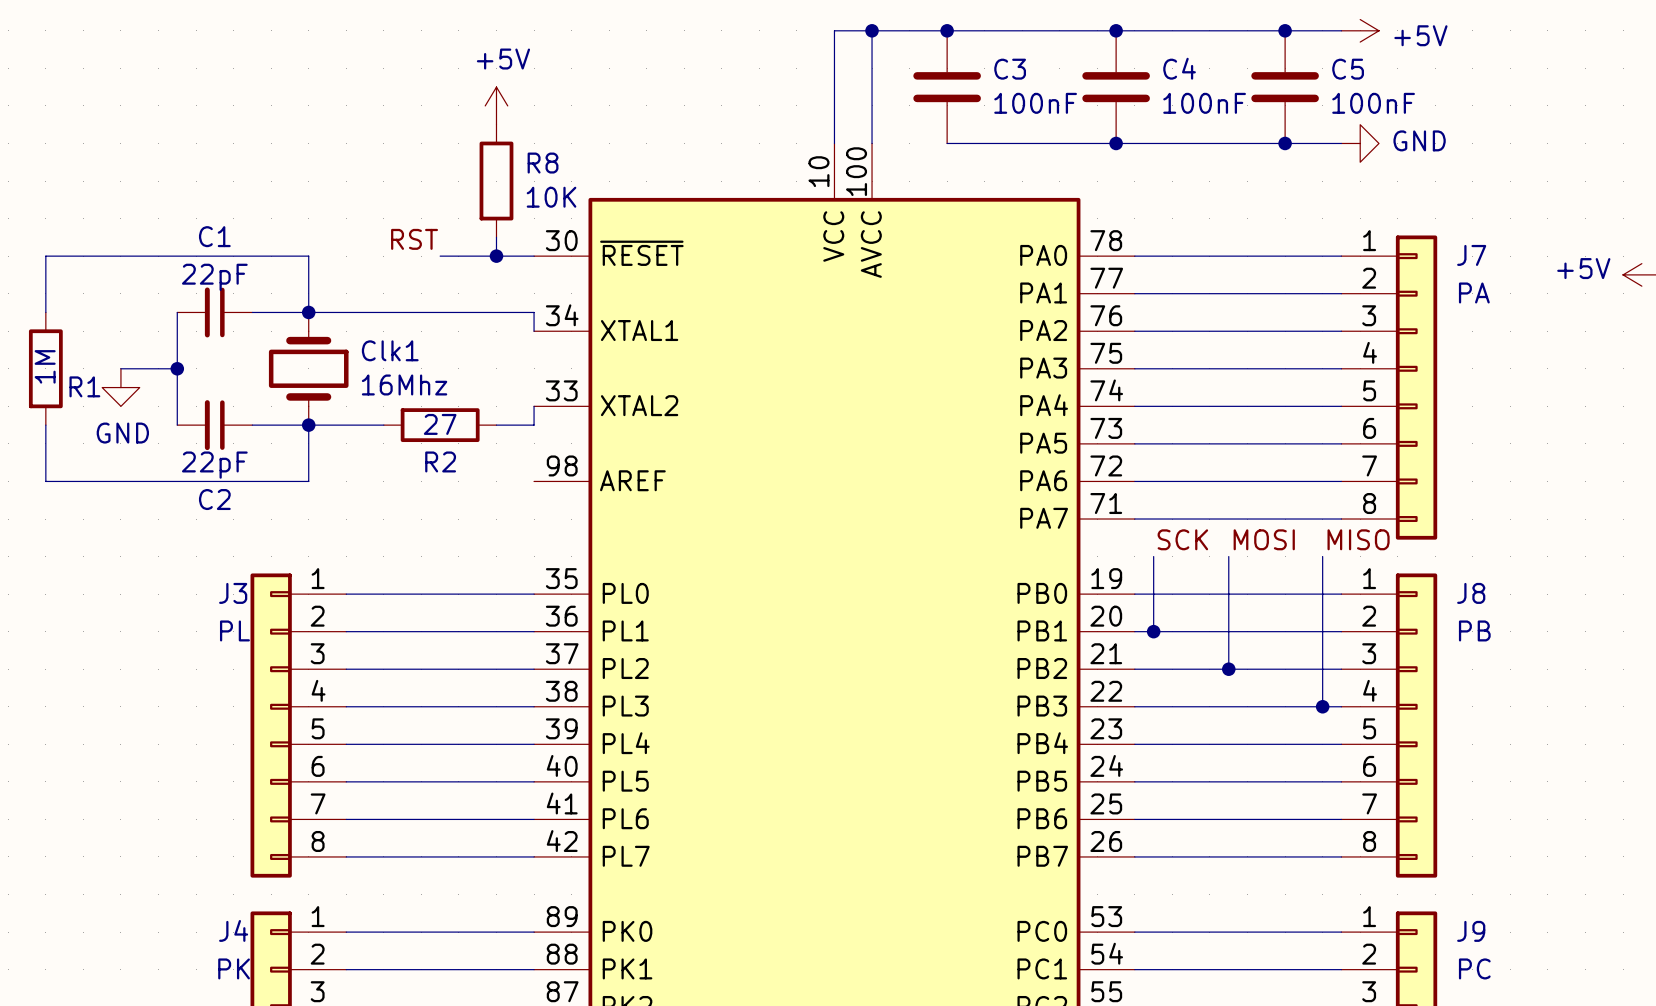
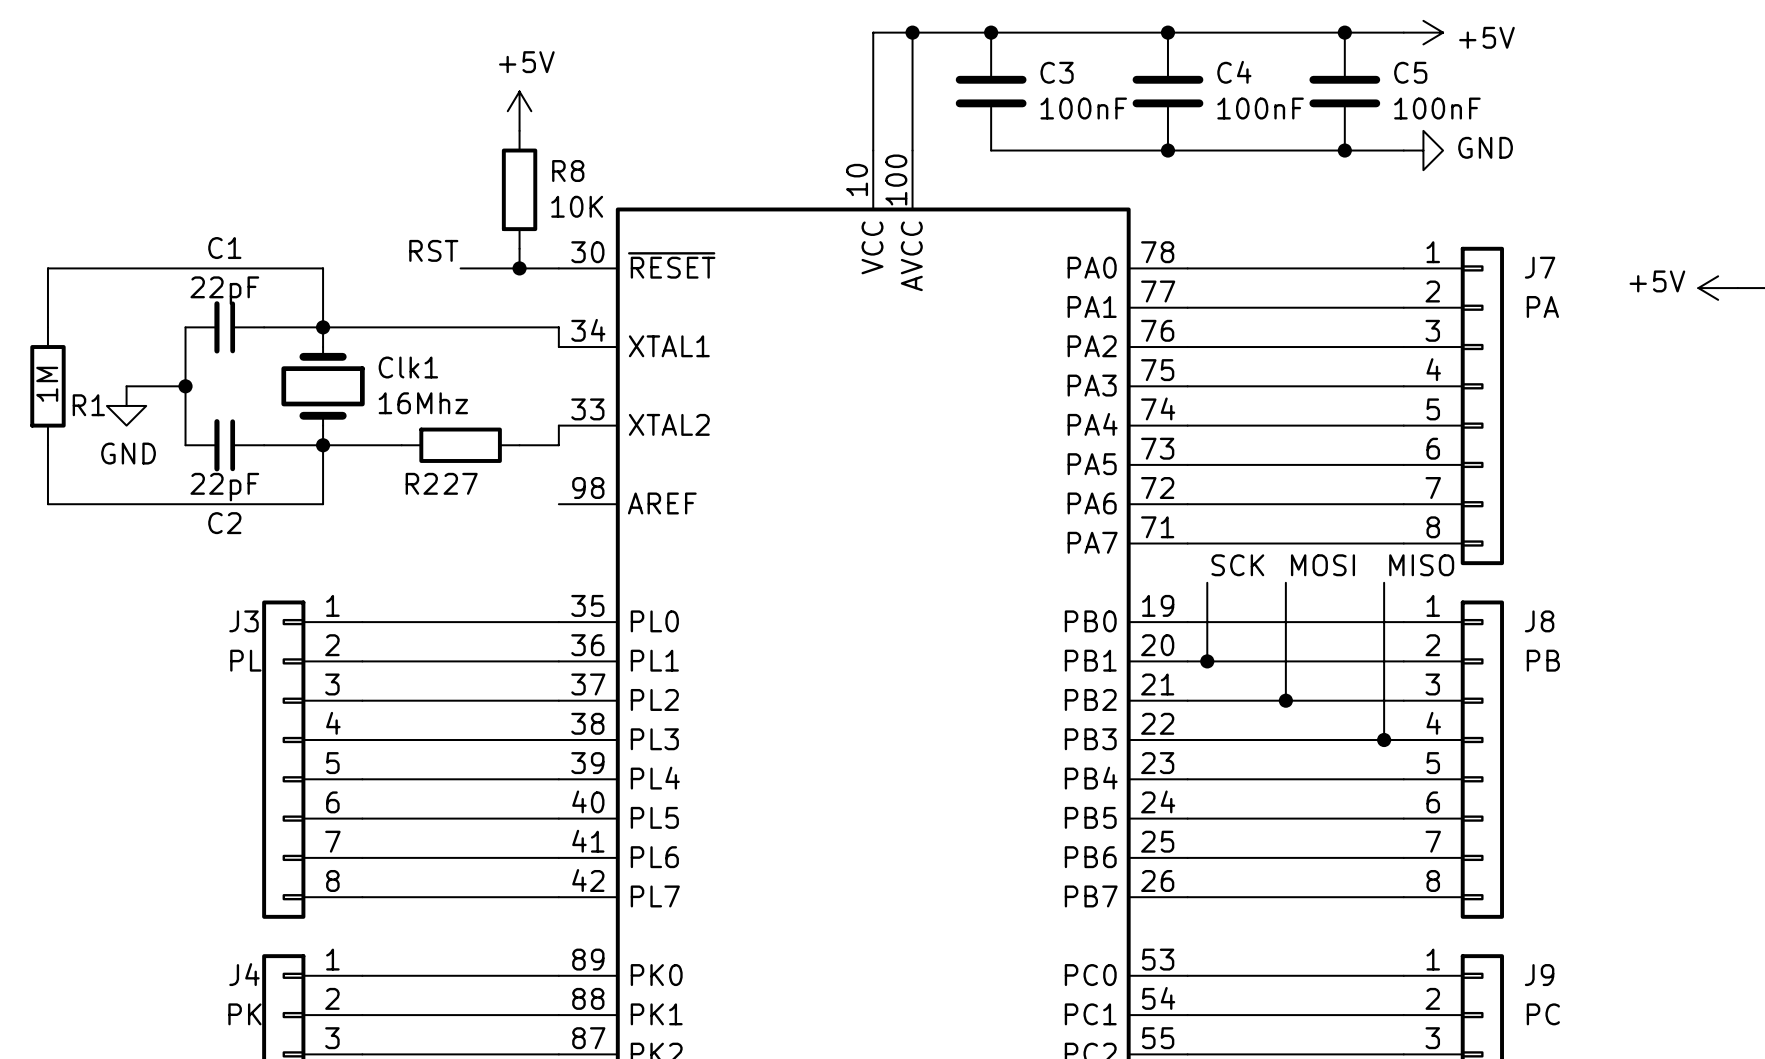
R2 value position: 27 (440, 424) -> 27 (460, 483)
R2 name position: R2 (440, 461) -> R2 (421, 483)

